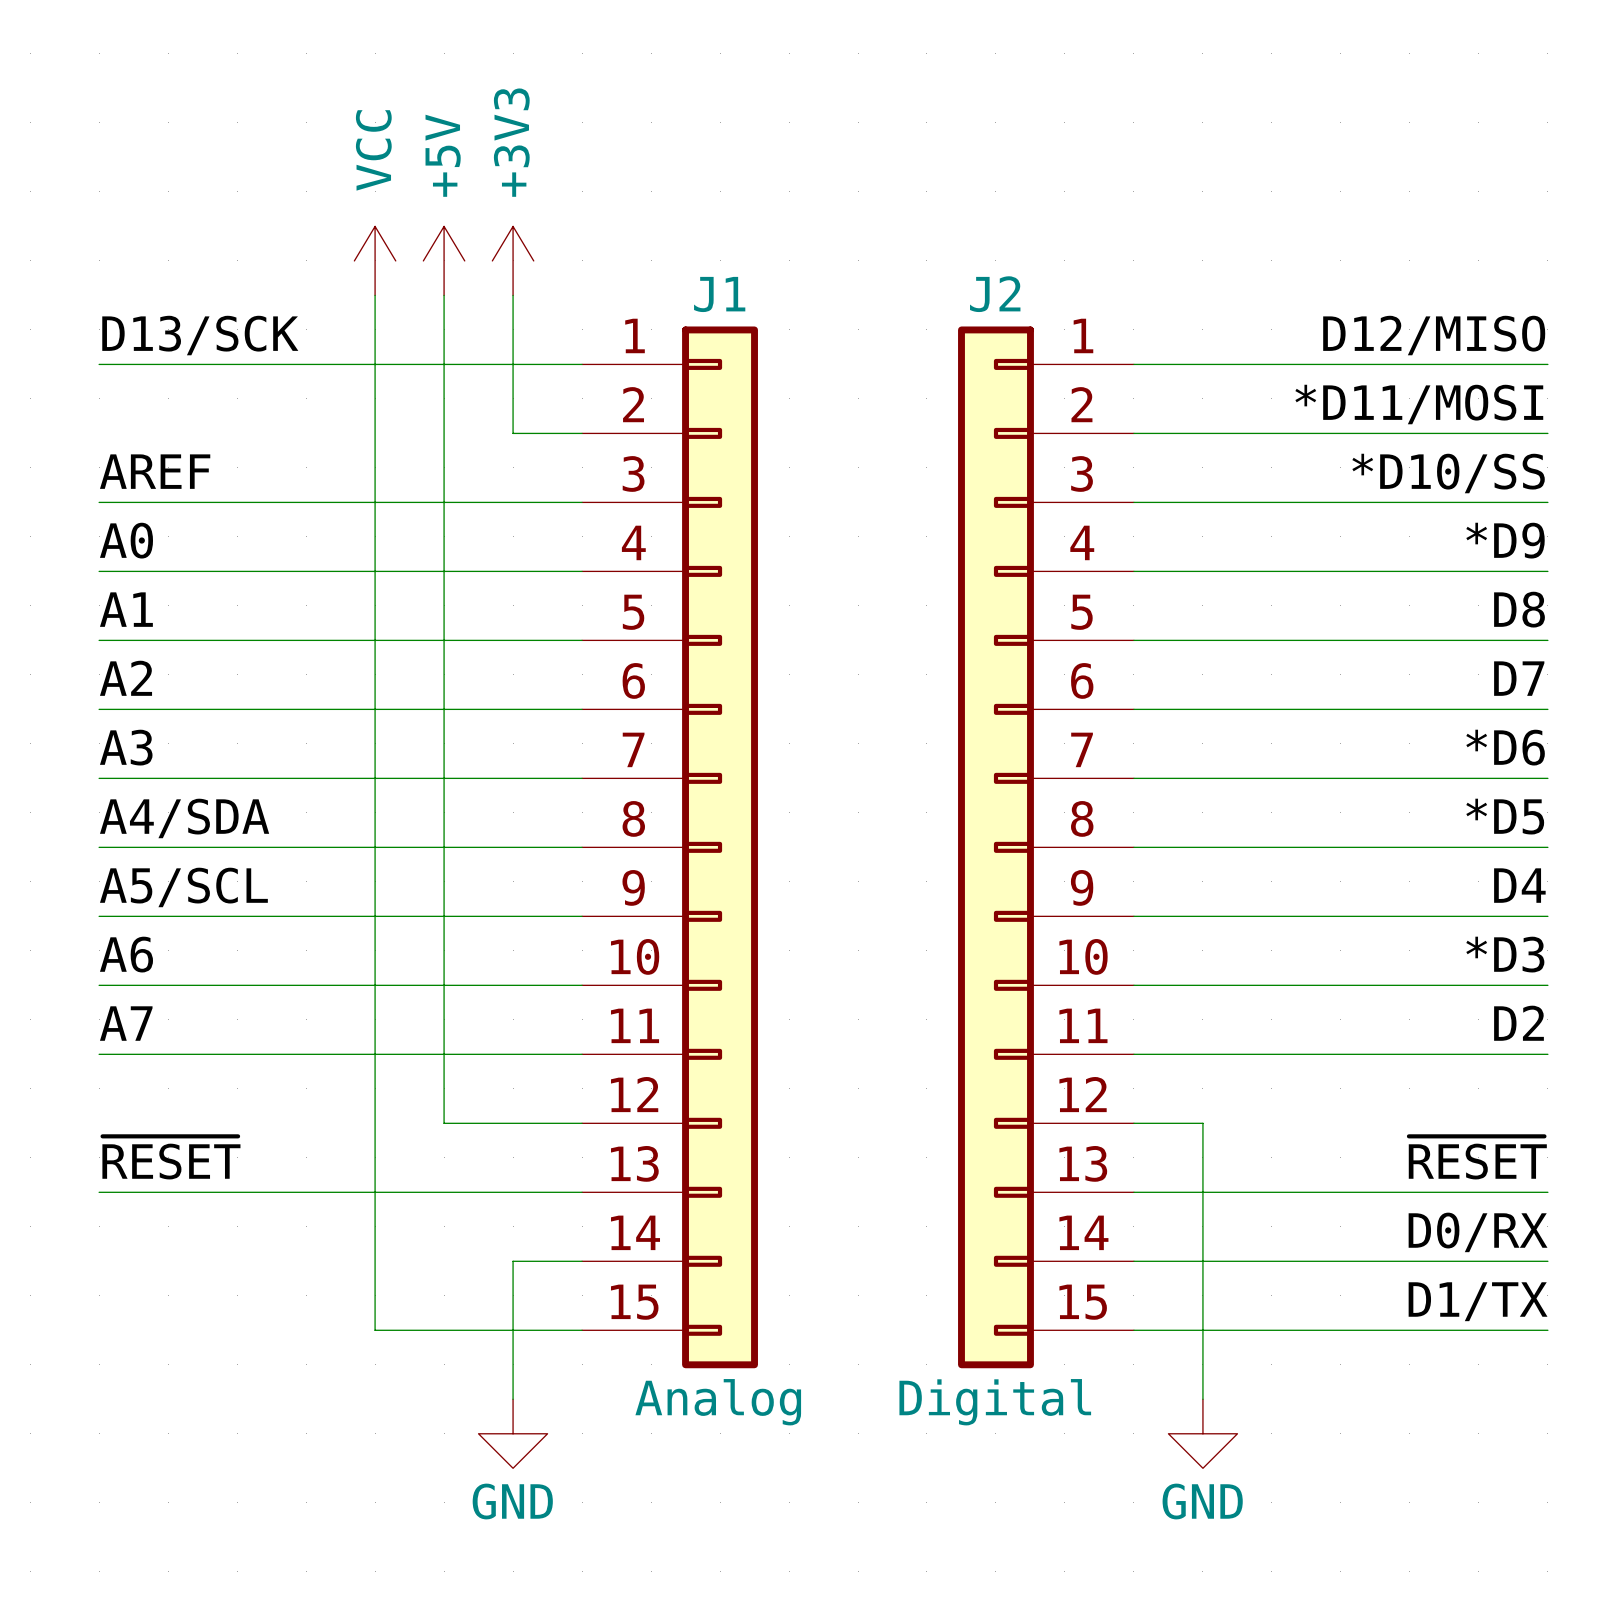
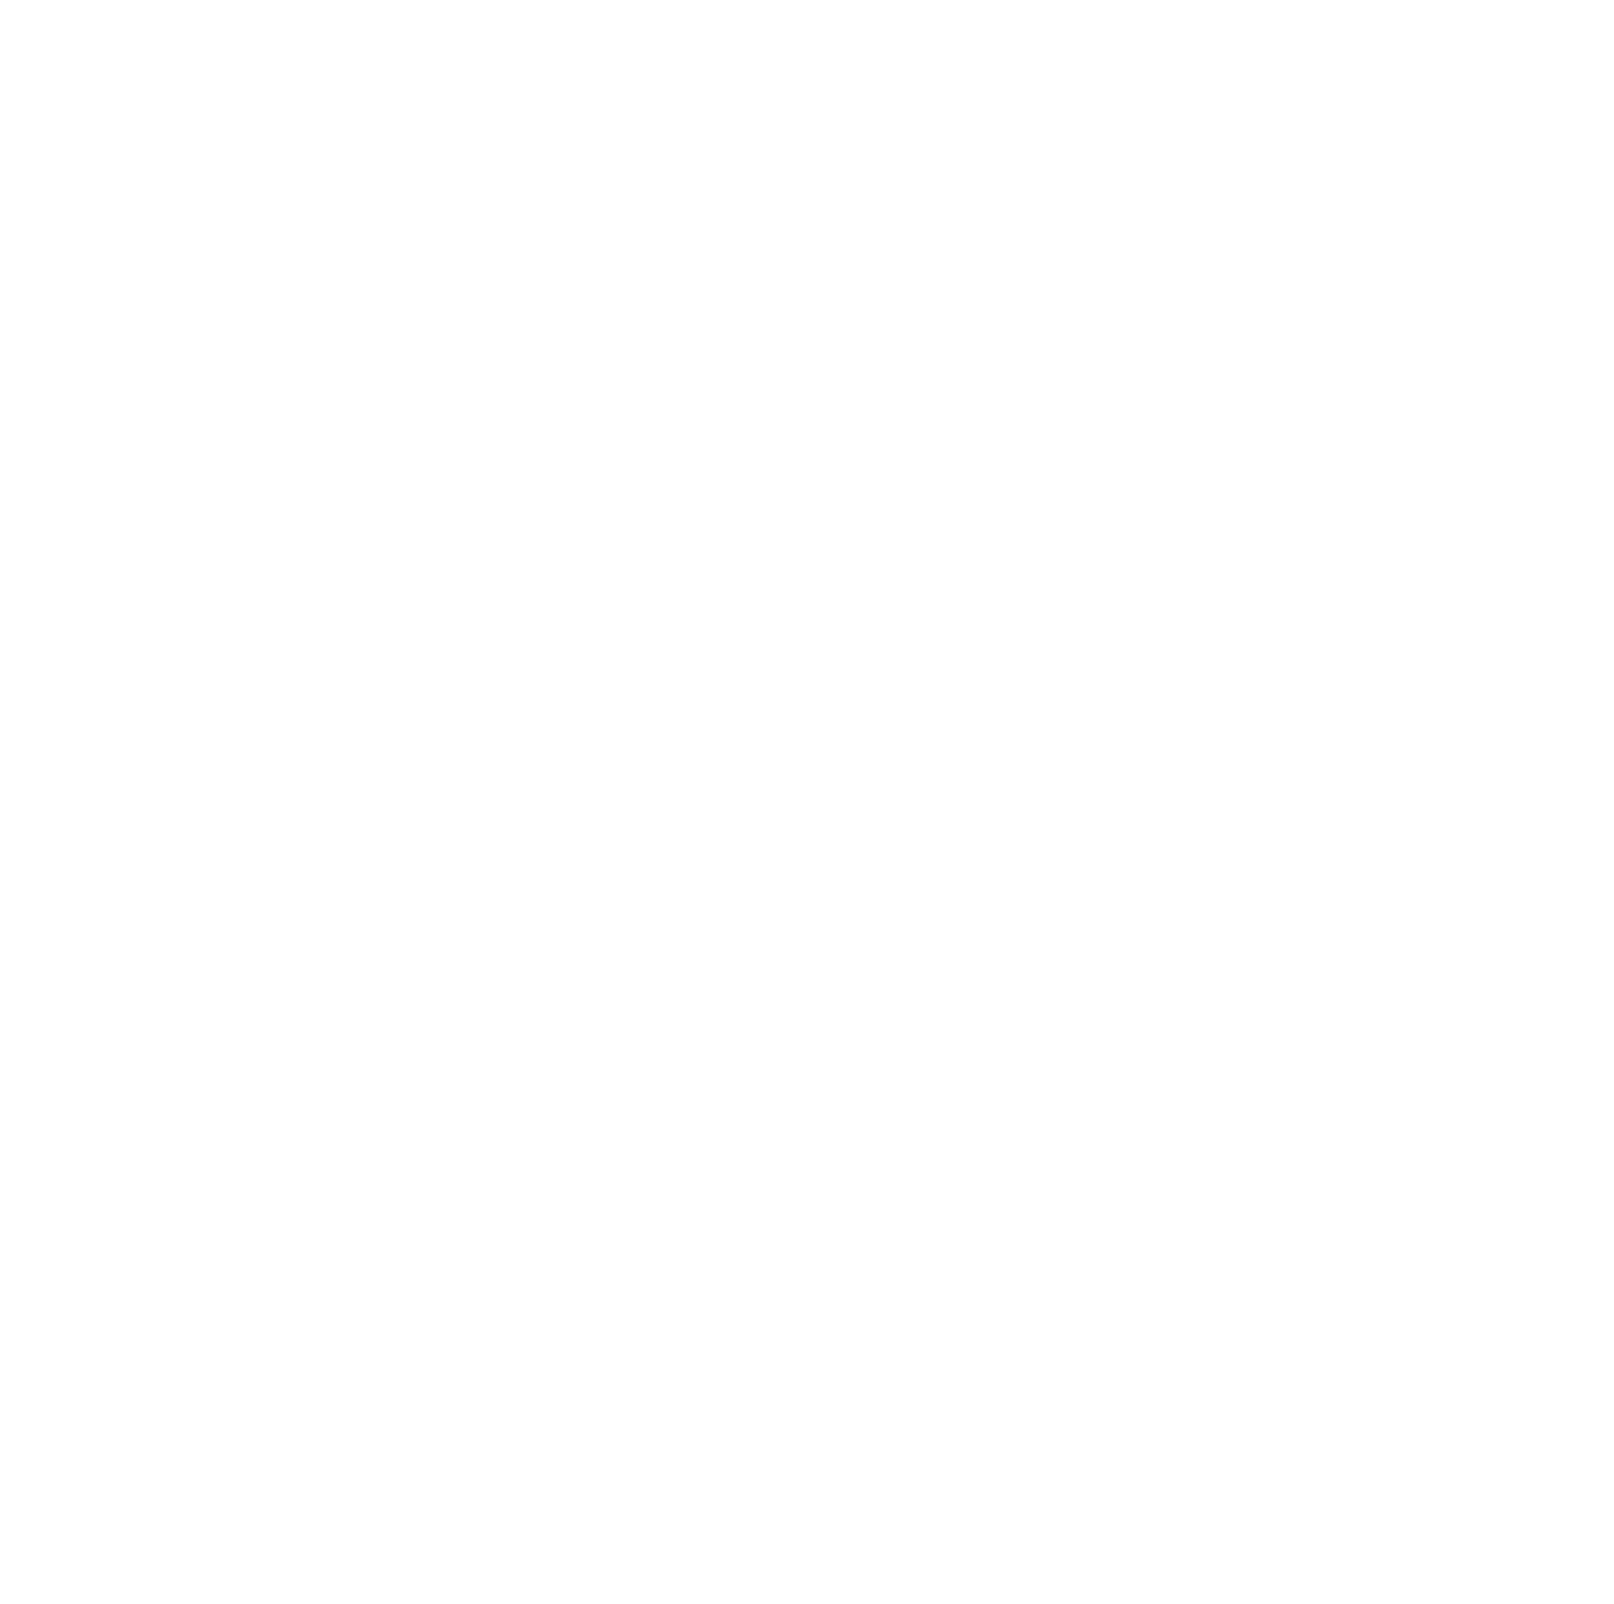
power symbol: VCC (375, 260) -> none
power symbol: +5V (444, 260) -> none
power symbol: +3V3 (513, 260) -> none
wire: (375, 295) (375, 1330) (582, 1330) -> none
wire: (444, 295) (444, 1123) (582, 1123) -> none
wire: (513, 295) (513, 433) (582, 433) -> none
label: D13/SCK (200, 335) -> none
label: D12/MISO (1434, 335) -> none
wire: (99, 364) (582, 364) -> none
wire: (1133, 364) (1547, 364) -> none
label: *D11/MOSI (1419, 404) -> none
wire: (1133, 433) (1547, 433) -> none
label: AREF (155, 471) -> none
label: *D10/SS (1448, 473) -> none
wire: (99, 502) (582, 502) -> none
wire: (1133, 502) (1547, 502) -> none
label: A0 (126, 540) -> none
label: *D9 (1505, 540) -> none
wire: (99, 571) (582, 571) -> none
wire: (1133, 571) (1547, 571) -> none
label: A1 (126, 609) -> none
label: D8 (1519, 609) -> none
wire: (99, 640) (582, 640) -> none
wire: (1133, 640) (1547, 640) -> none
label: A2 (126, 678) -> none
label: D7 (1519, 678) -> none
wire: (99, 709) (582, 709) -> none
wire: (1133, 709) (1547, 709) -> none
label: A3 (126, 747) -> none
label: *D6 (1505, 747) -> none
wire: (99, 778) (582, 778) -> none
wire: (1133, 778) (1547, 778) -> none
label: *D5 (1505, 816) -> none
label: A4/SDA (184, 818) -> none
wire: (99, 847) (582, 847) -> none
J1: Analog (670, 847) -> none
J2: Digital (1046, 847) -> none
wire: (1133, 847) (1547, 847) -> none
label: D4 (1519, 885) -> none
label: A5/SCL (183, 887) -> none
wire: (99, 916) (582, 916) -> none
wire: (1133, 916) (1547, 916) -> none
label: A6 (126, 954) -> none
label: *D3 (1505, 954) -> none
wire: (99, 985) (582, 985) -> none
wire: (1133, 985) (1547, 985) -> none
label: A7 (126, 1023) -> none
label: D2 (1519, 1023) -> none
wire: (99, 1054) (582, 1054) -> none
wire: (1133, 1054) (1547, 1054) -> none
wire: (1133, 1123) (1202, 1123) (1202, 1399) -> none
label: ~{RESET} (171, 1157) -> none
label: ~{RESET} (1477, 1157) -> none
wire: (99, 1192) (582, 1192) -> none
wire: (1133, 1192) (1547, 1192) -> none
label: D0/RX (1478, 1232) -> none
wire: (582, 1261) (513, 1261) (513, 1399) -> none
wire: (1133, 1261) (1547, 1261) -> none
label: D1/TX (1478, 1301) -> none
wire: (1133, 1330) (1547, 1330) -> none
power symbol: GND (513, 1433) -> none
power symbol: GND (1202, 1433) -> none

